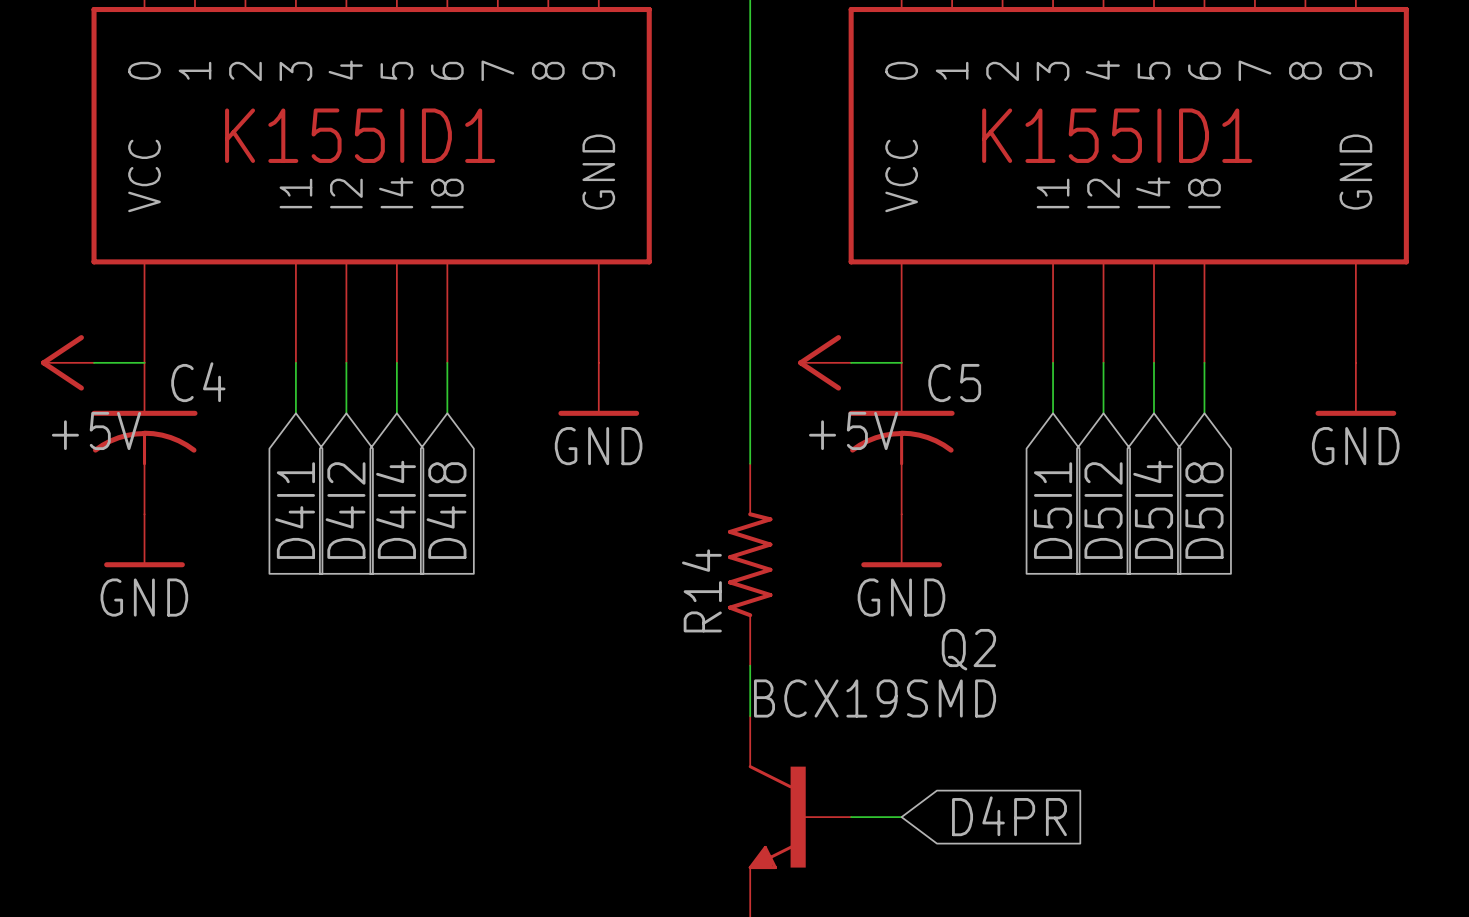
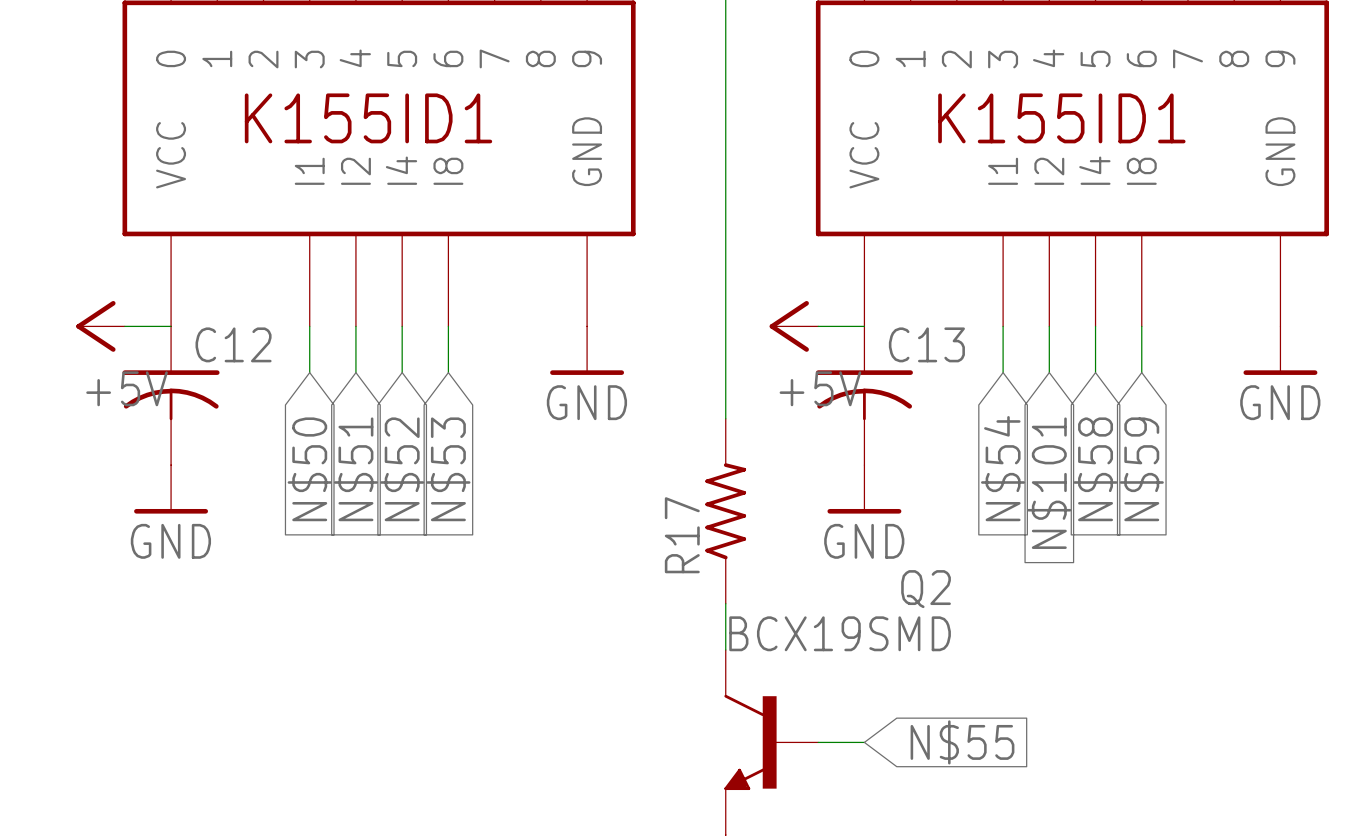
C4 name: C4 (198, 382) -> C12 (233, 344)
C5 name: C5 (954, 383) -> C13 (926, 344)
global label: D4I4 (396, 509) -> N$52 (402, 469)
global label: D5I4 (1153, 509) -> N$58 (1095, 469)
global label: D4I1 (295, 510) -> N$50 (309, 469)
global label: D4I2 (345, 510) -> N$51 (355, 469)
global label: D4I8 (446, 510) -> N$53 (448, 469)
global label: D5I1 (1053, 510) -> N$54 (1003, 468)
global label: D5I2 (1103, 510) -> N$101 (1049, 483)
global label: D5I8 (1204, 510) -> N$59 (1141, 469)
R14 name: R14 (701, 590) -> R17 (682, 535)
global label: D4PR (1009, 816) -> N$55 (962, 742)

